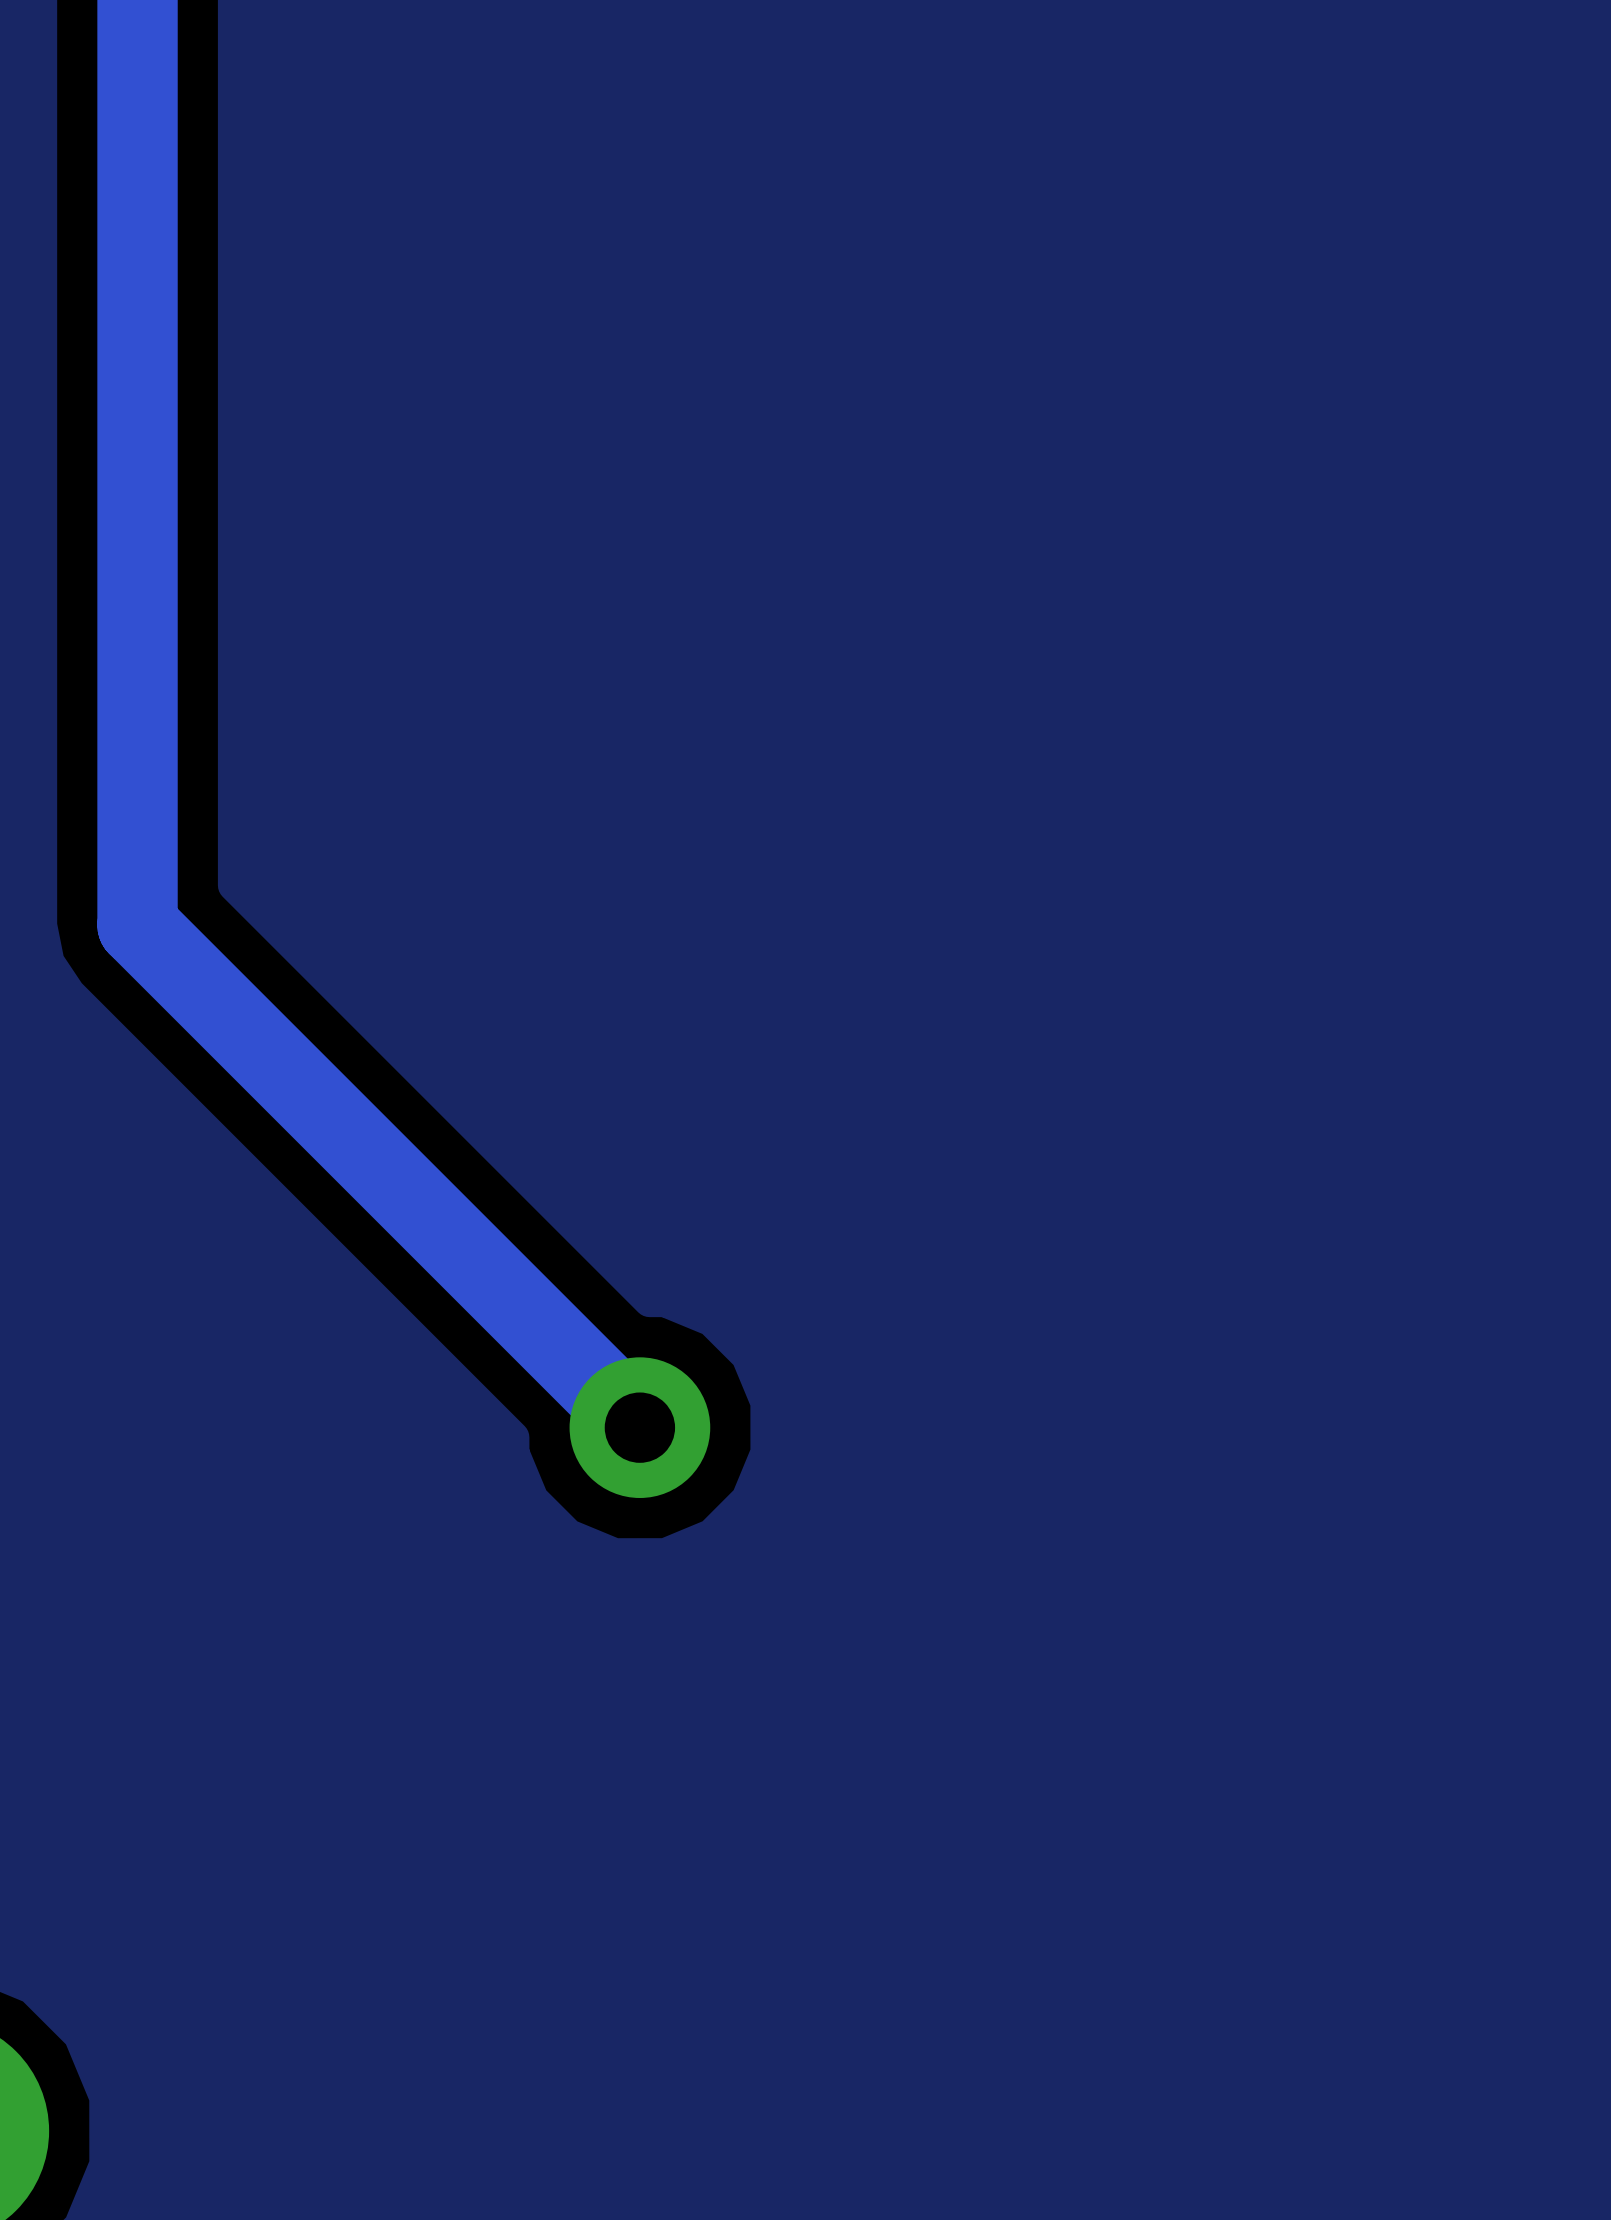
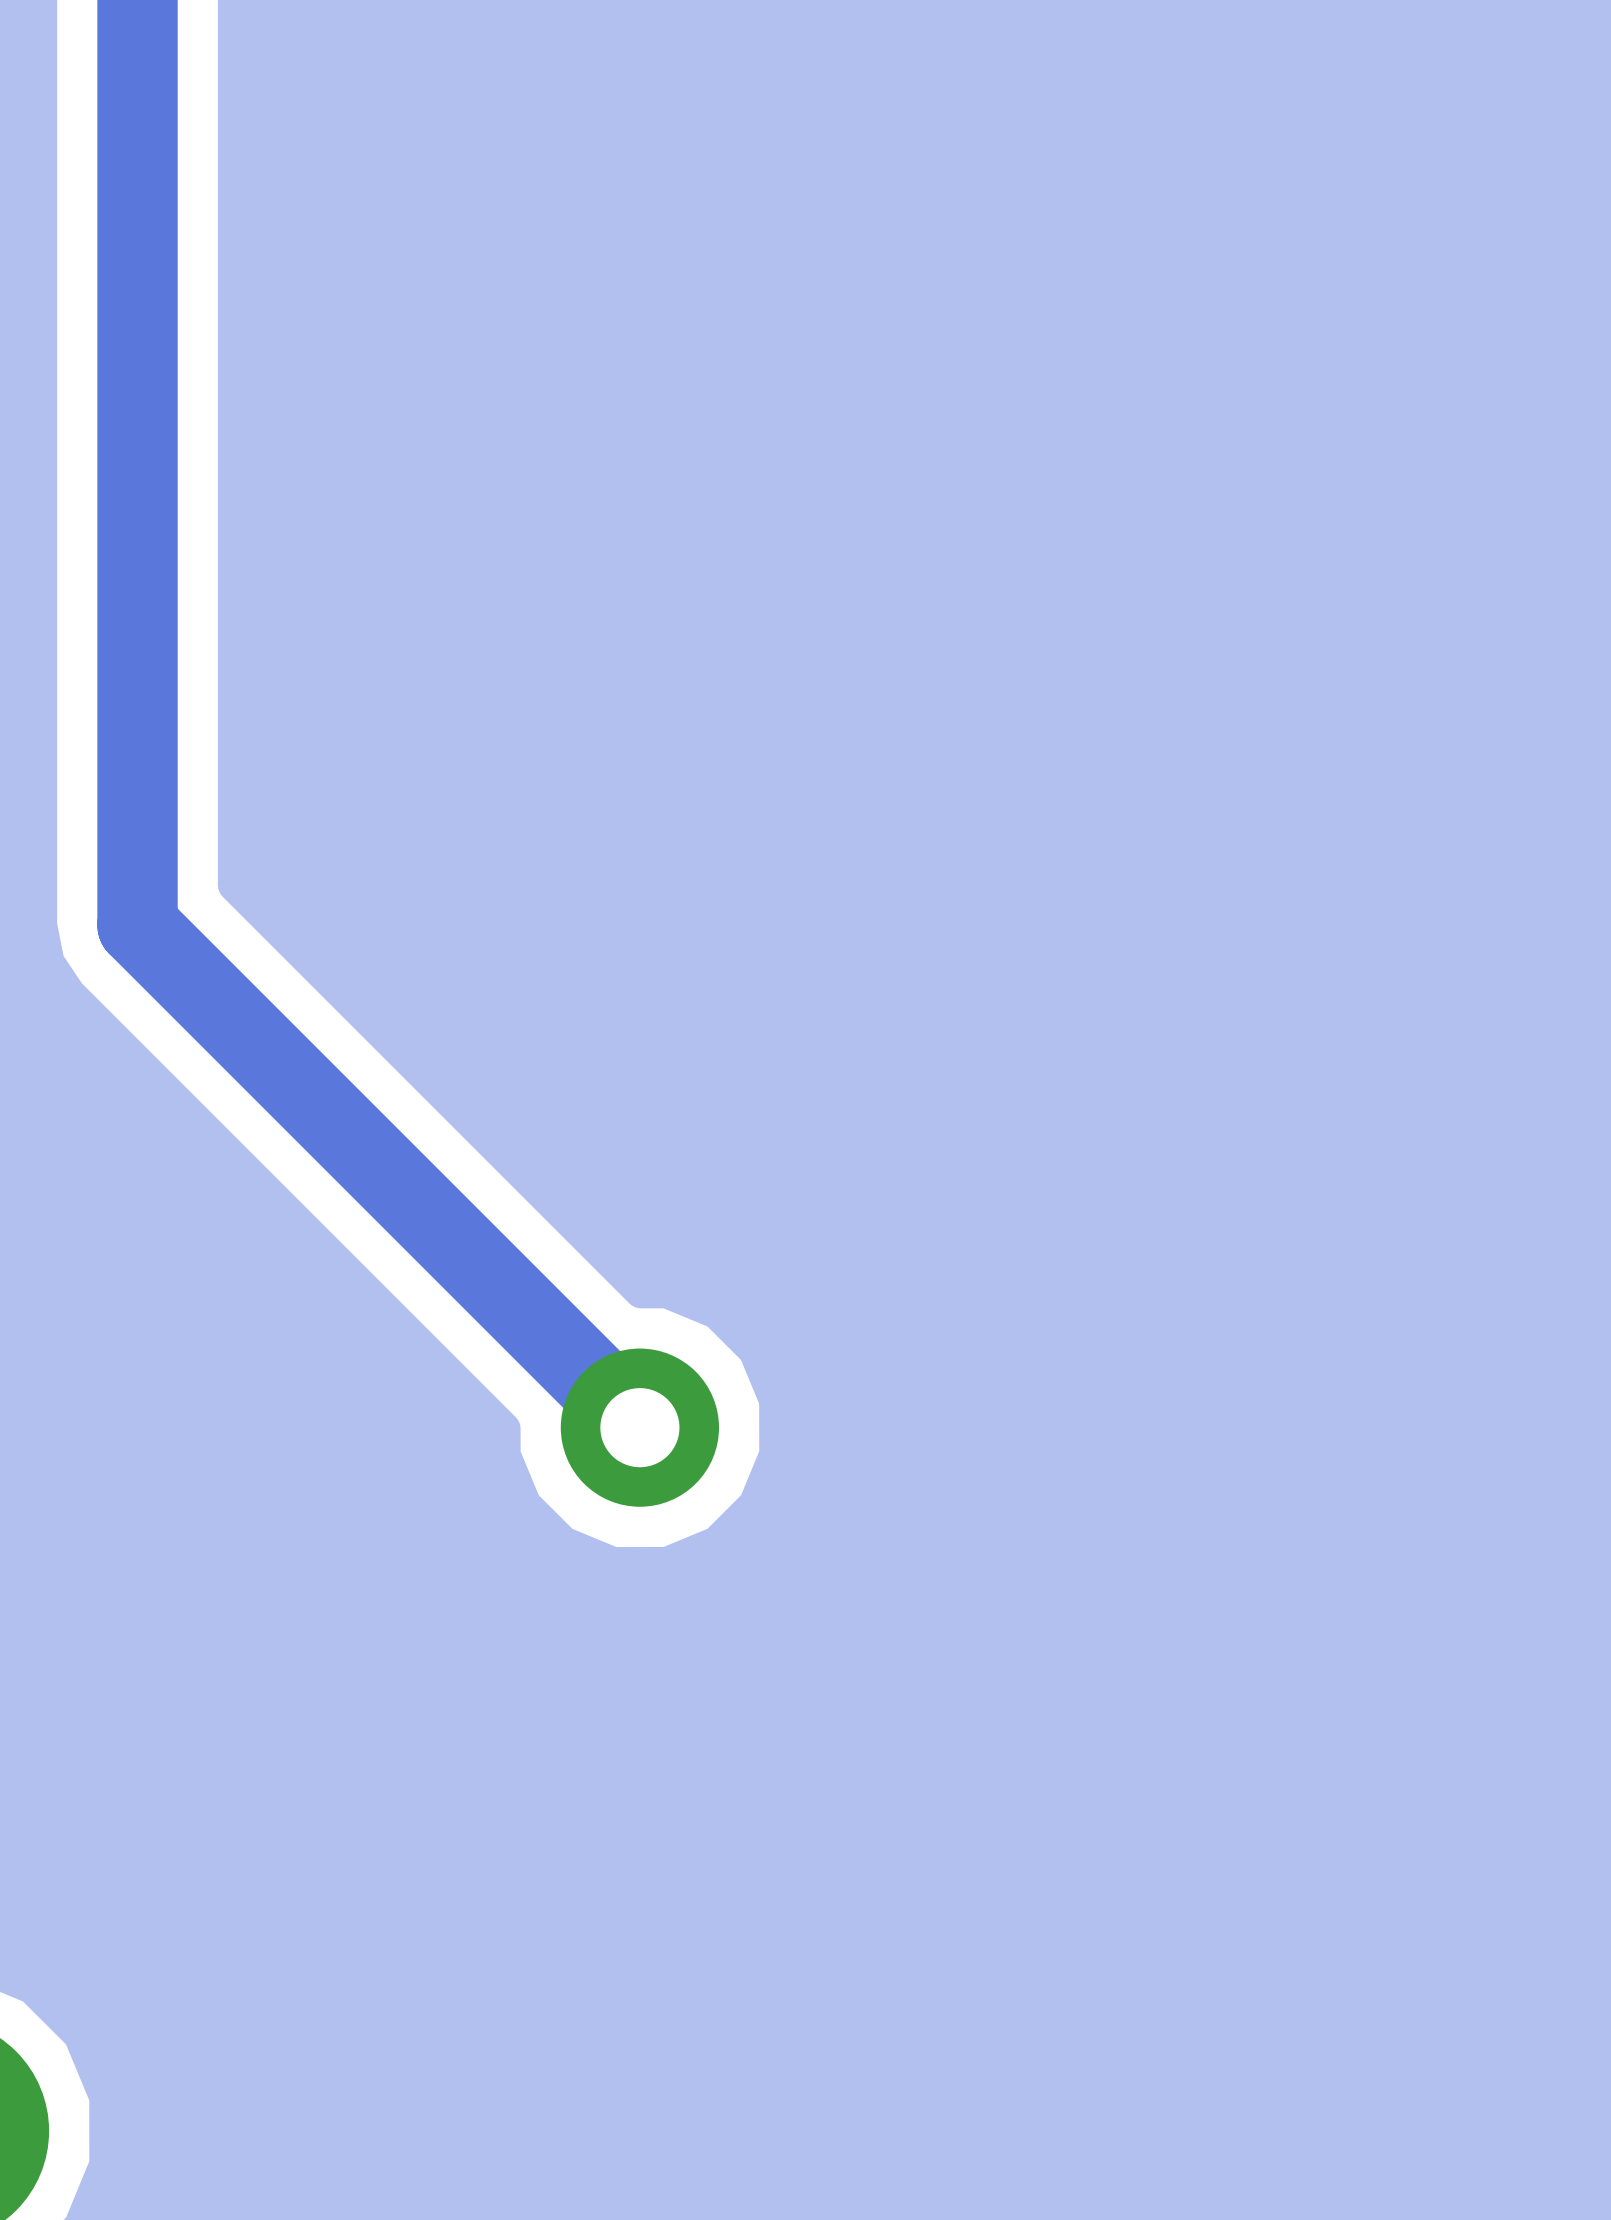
via size: [569, 1357, 711, 1498] -> [560, 1348, 720, 1507]

